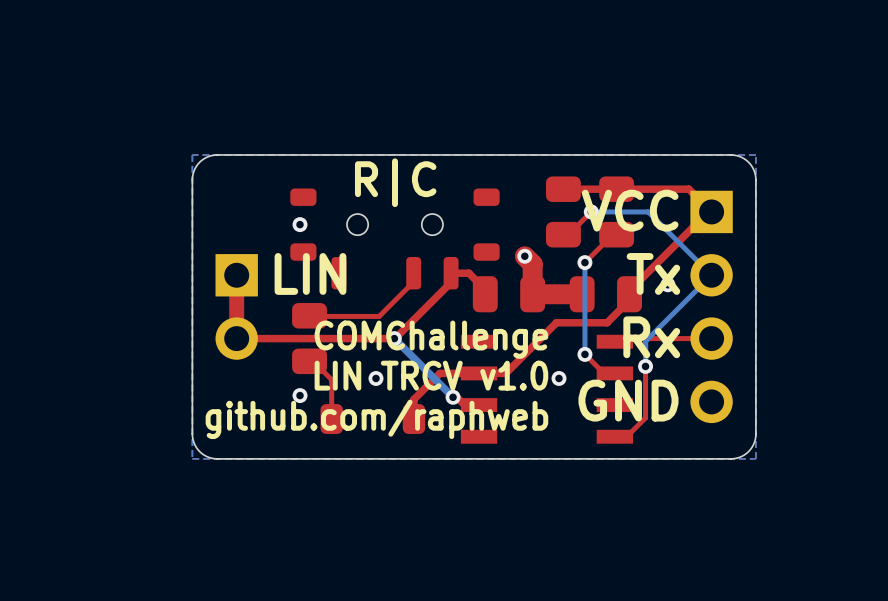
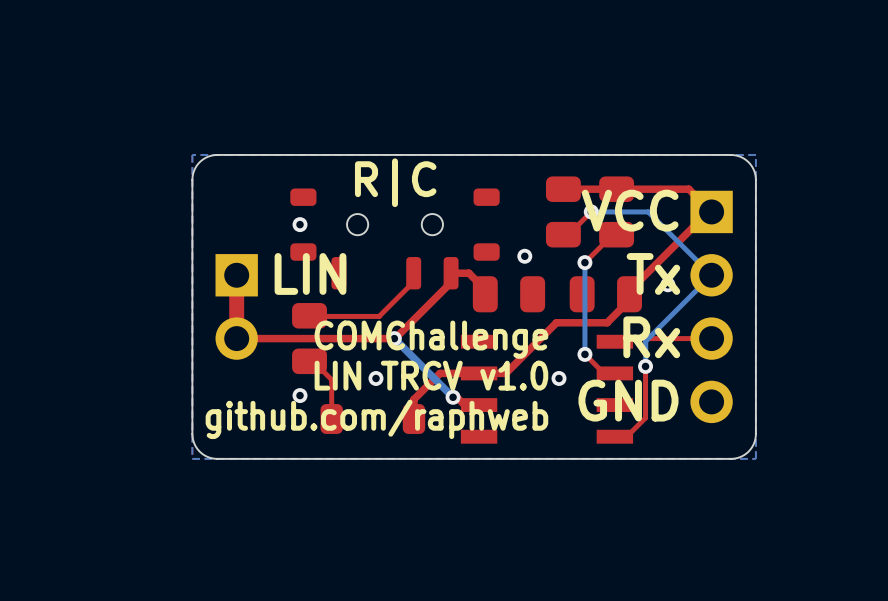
top track: (524, 256) (532, 264) (532, 294) (582, 294) -> none

